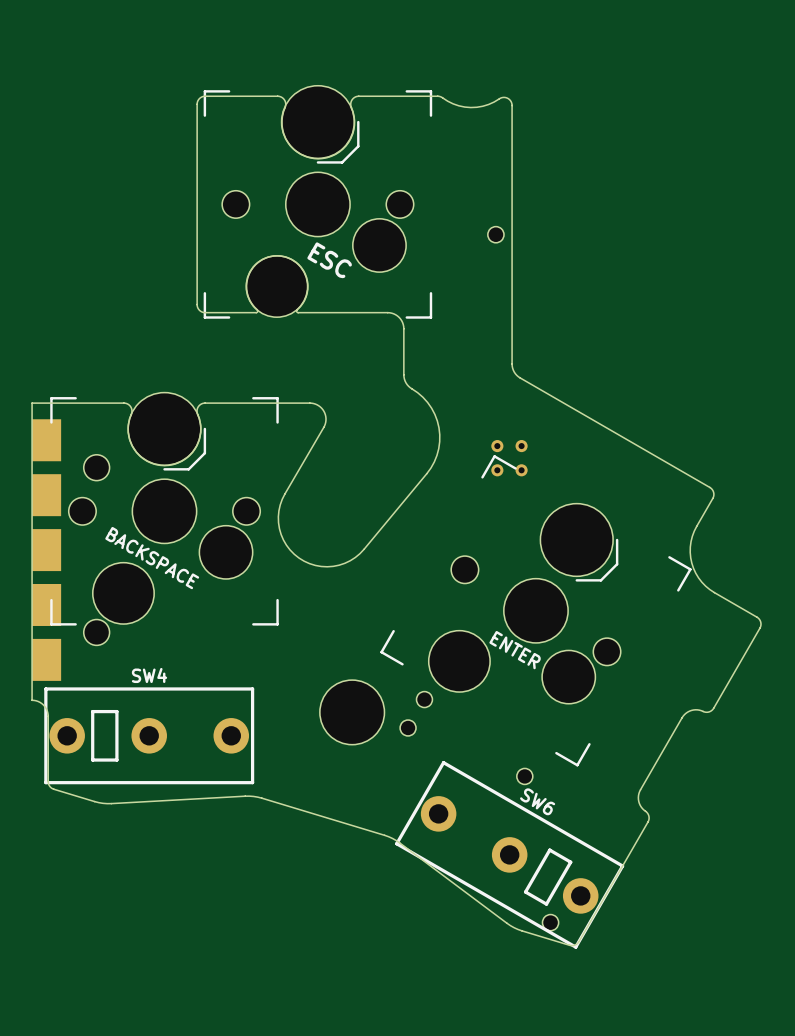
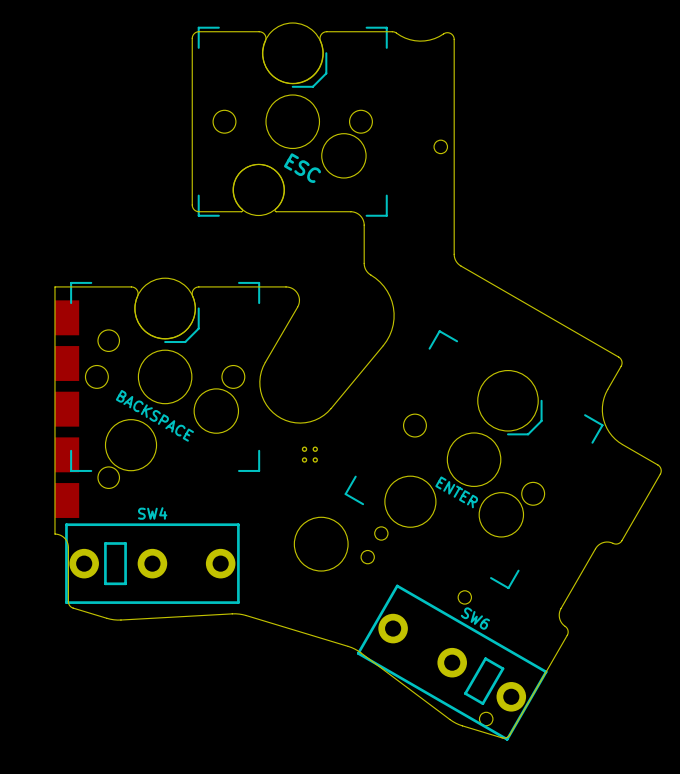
part: (509, 458) -> none
part: none -> (309, 454)

